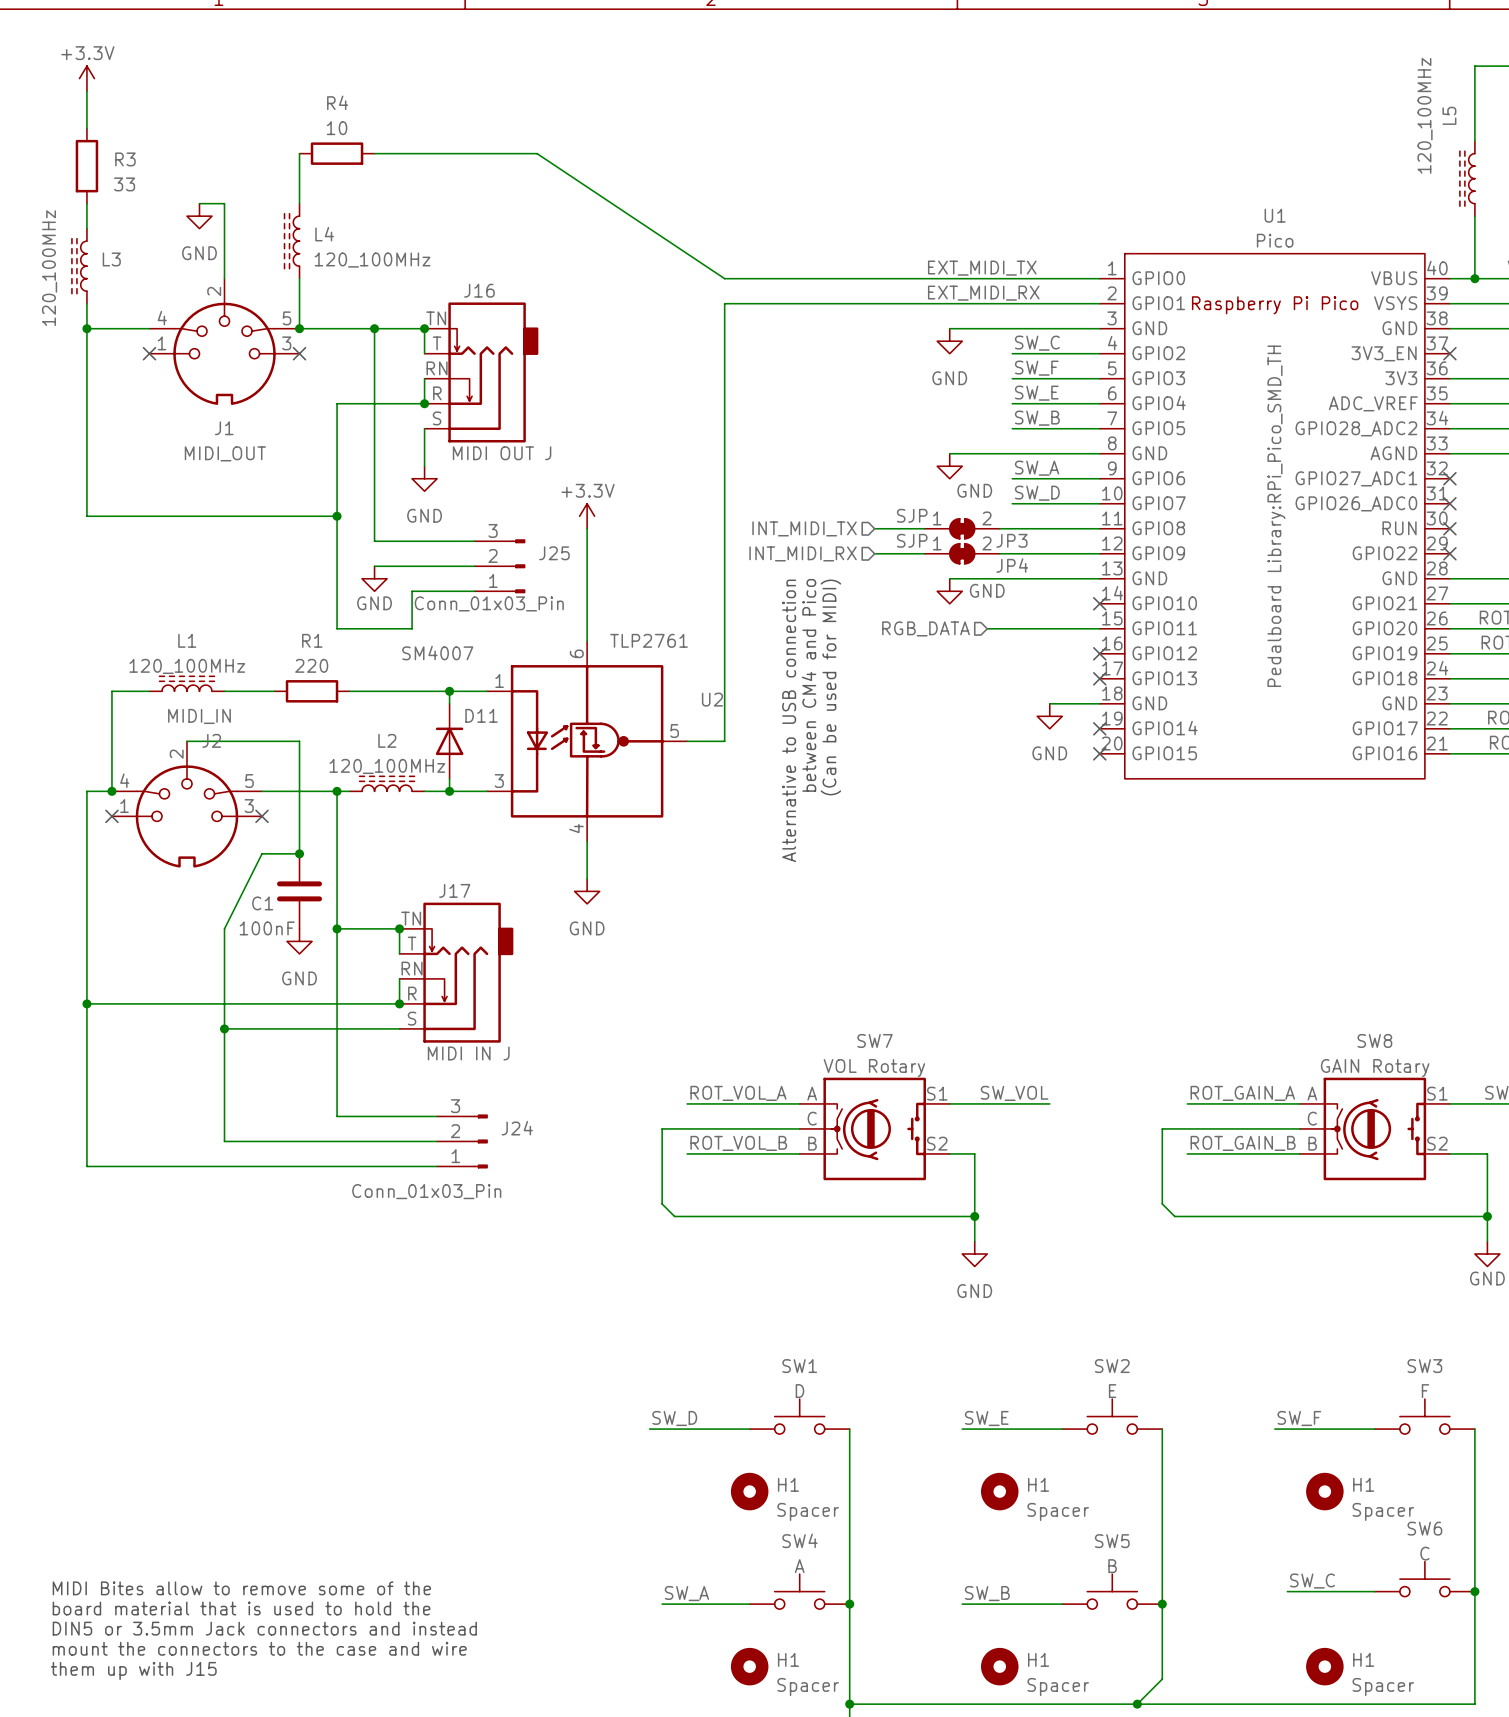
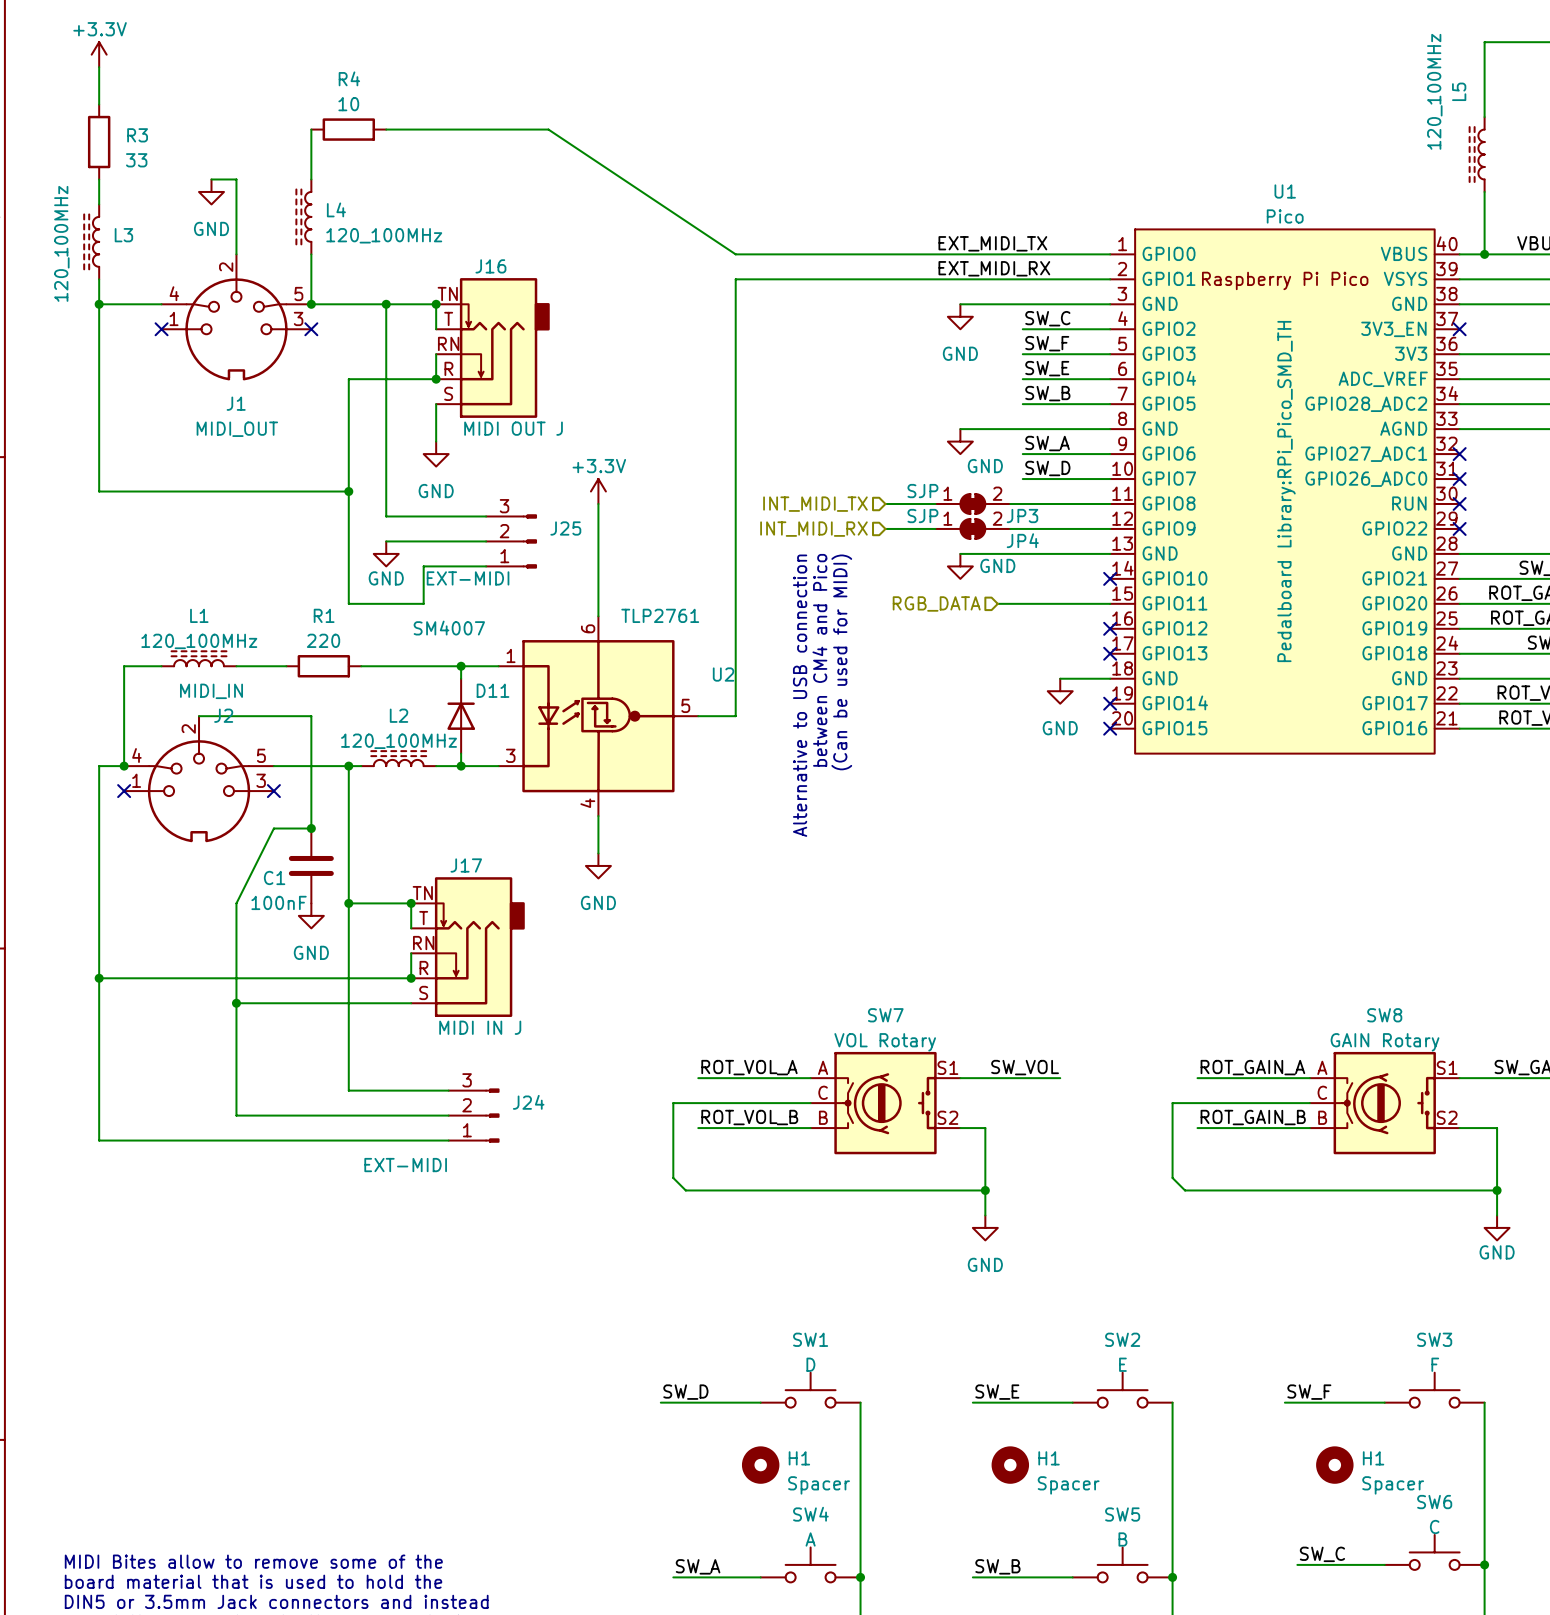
J25 value: Conn_01x03_Pin (489, 603) -> EXT-MIDI (468, 578)
J24 value: Conn_01x03_Pin (426, 1191) -> EXT-MIDI (405, 1165)

